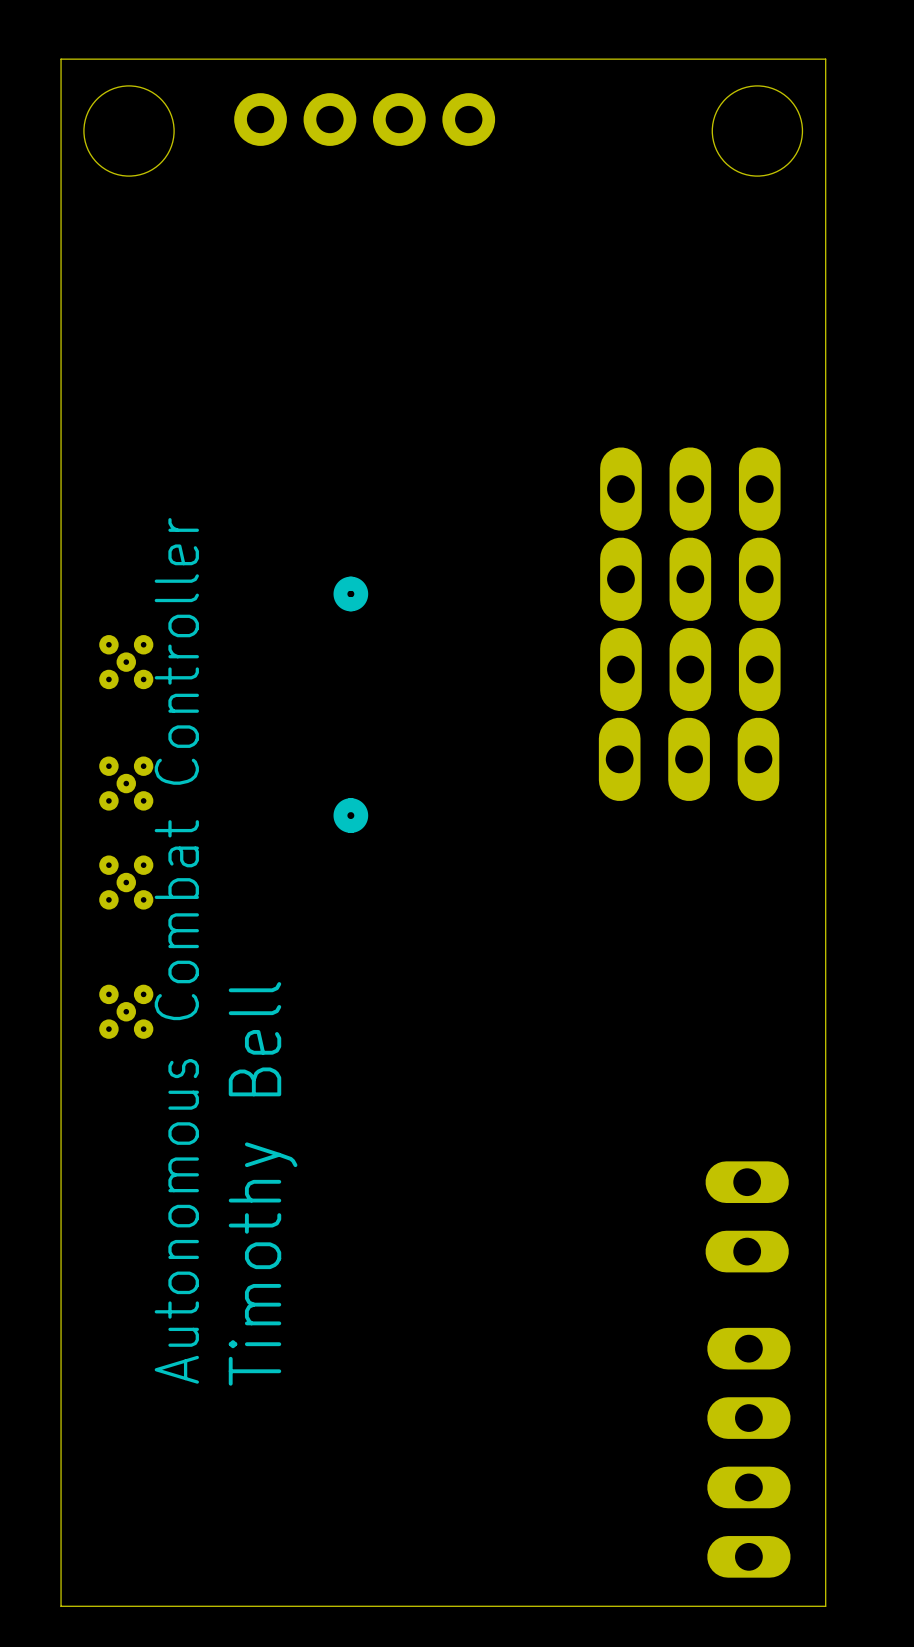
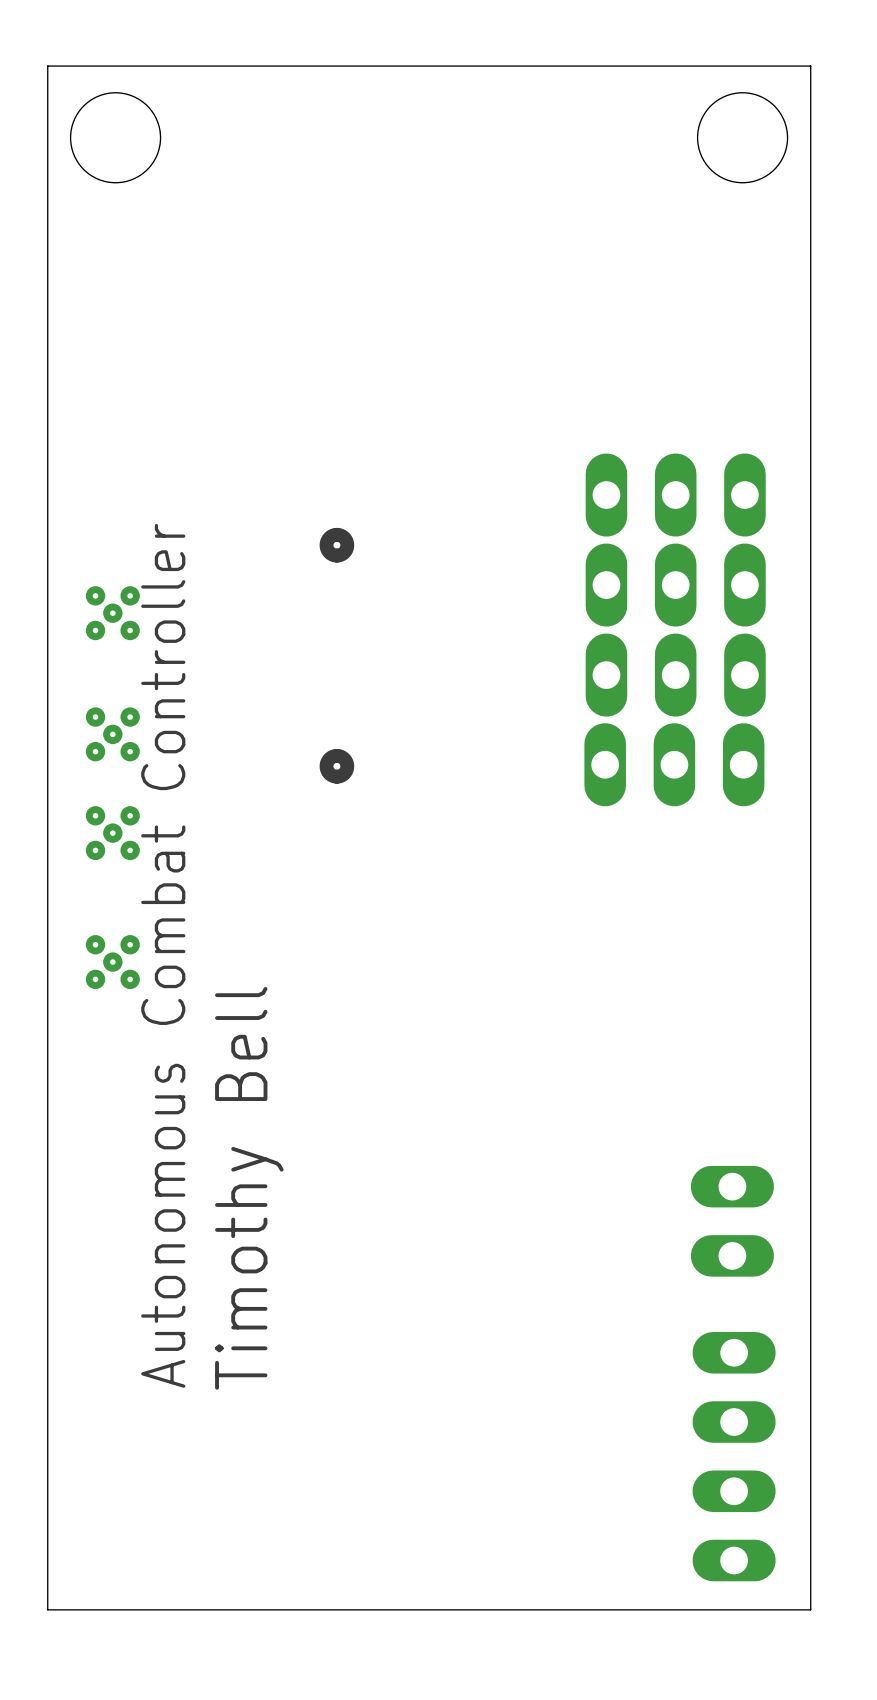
part: (364, 119) -> none
part position: (350, 593) -> (336, 545)
part: none -> (112, 613)
part: (126, 662) -> none
part: none -> (112, 734)
part: (126, 783) -> none
part position: (350, 815) -> (336, 766)
part: none -> (112, 833)
part: (126, 882) -> none
part: none -> (112, 962)
part: (126, 1011) -> none

